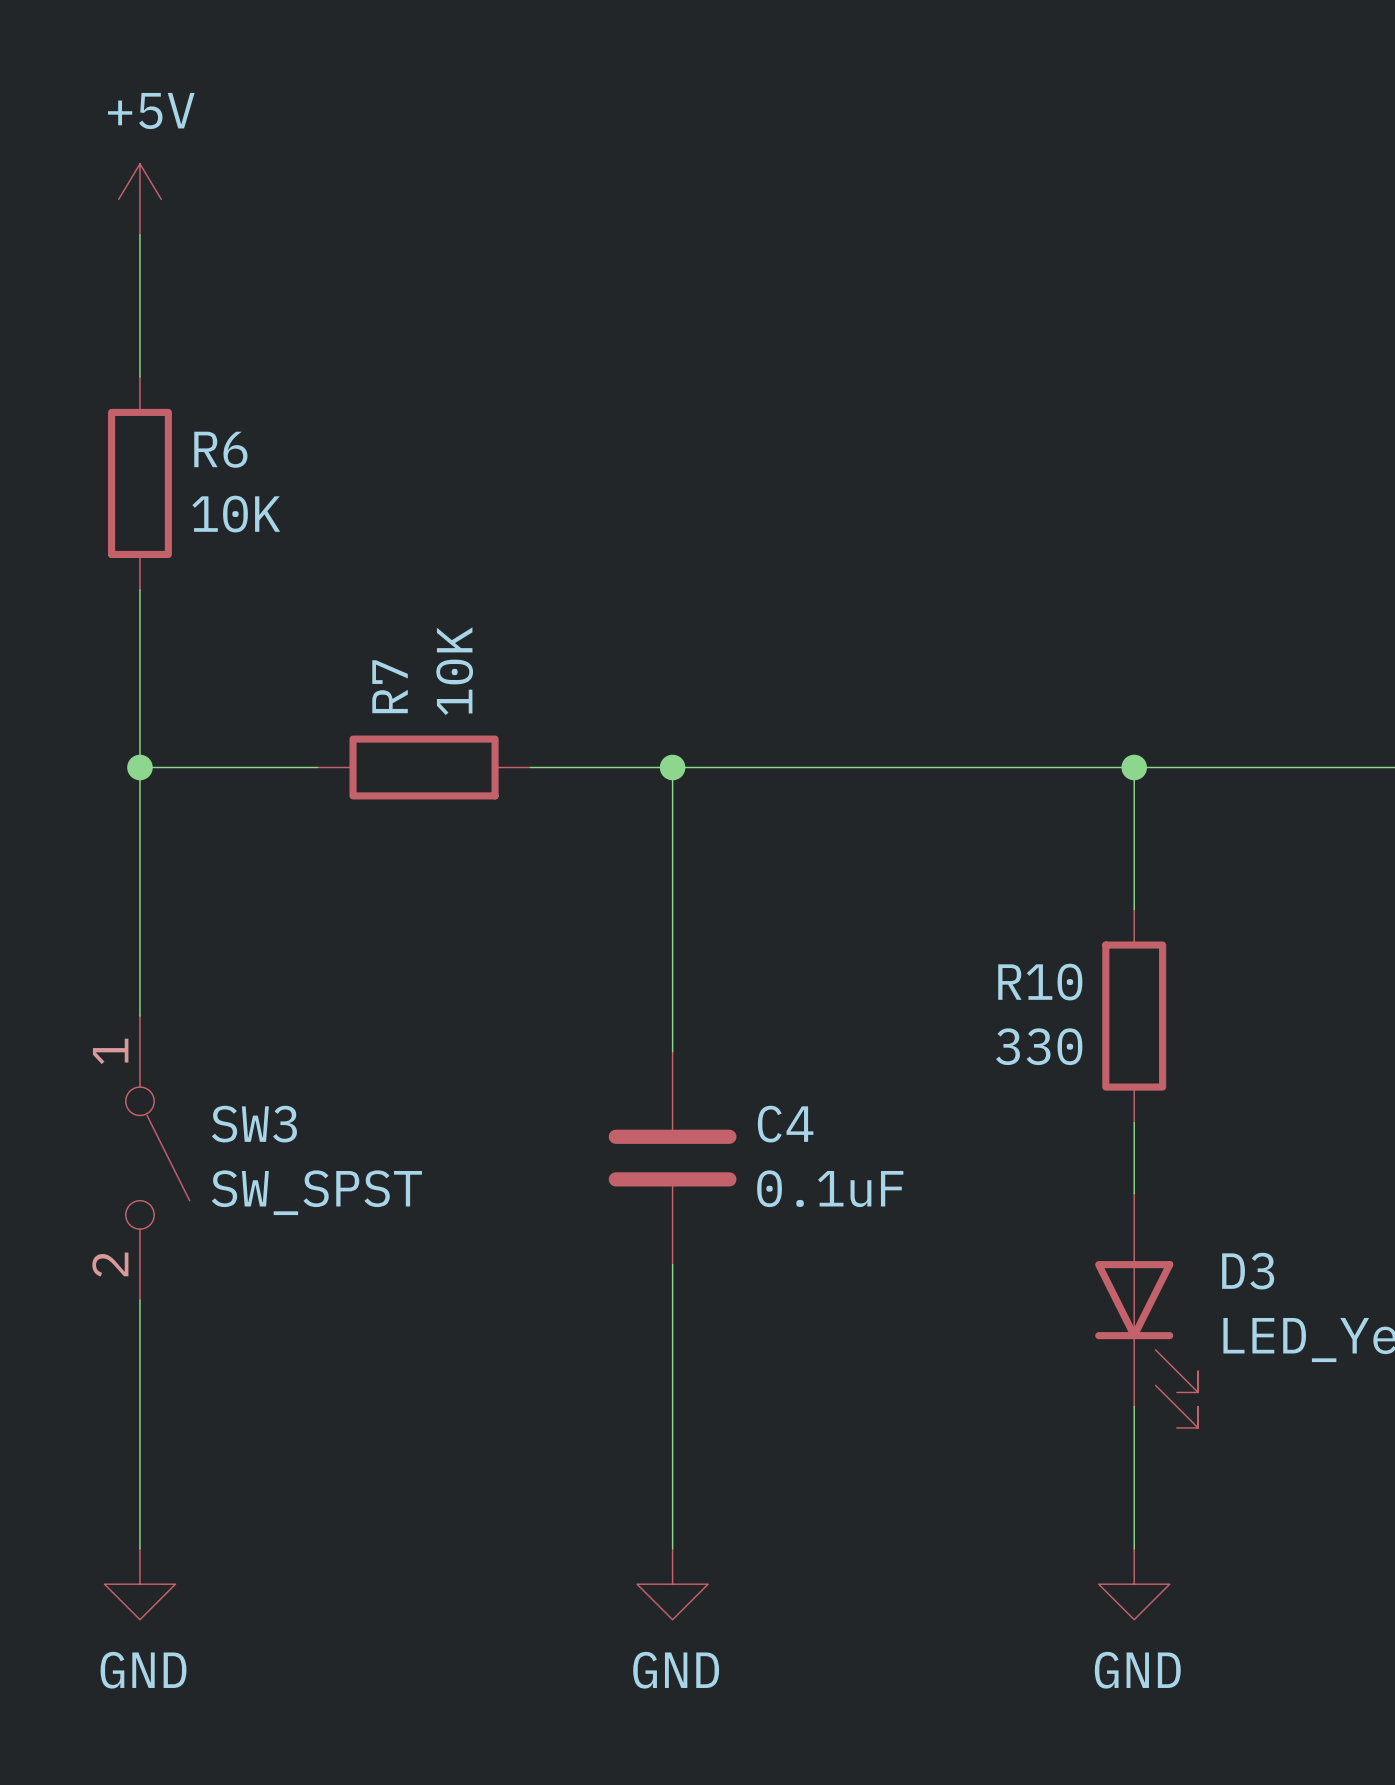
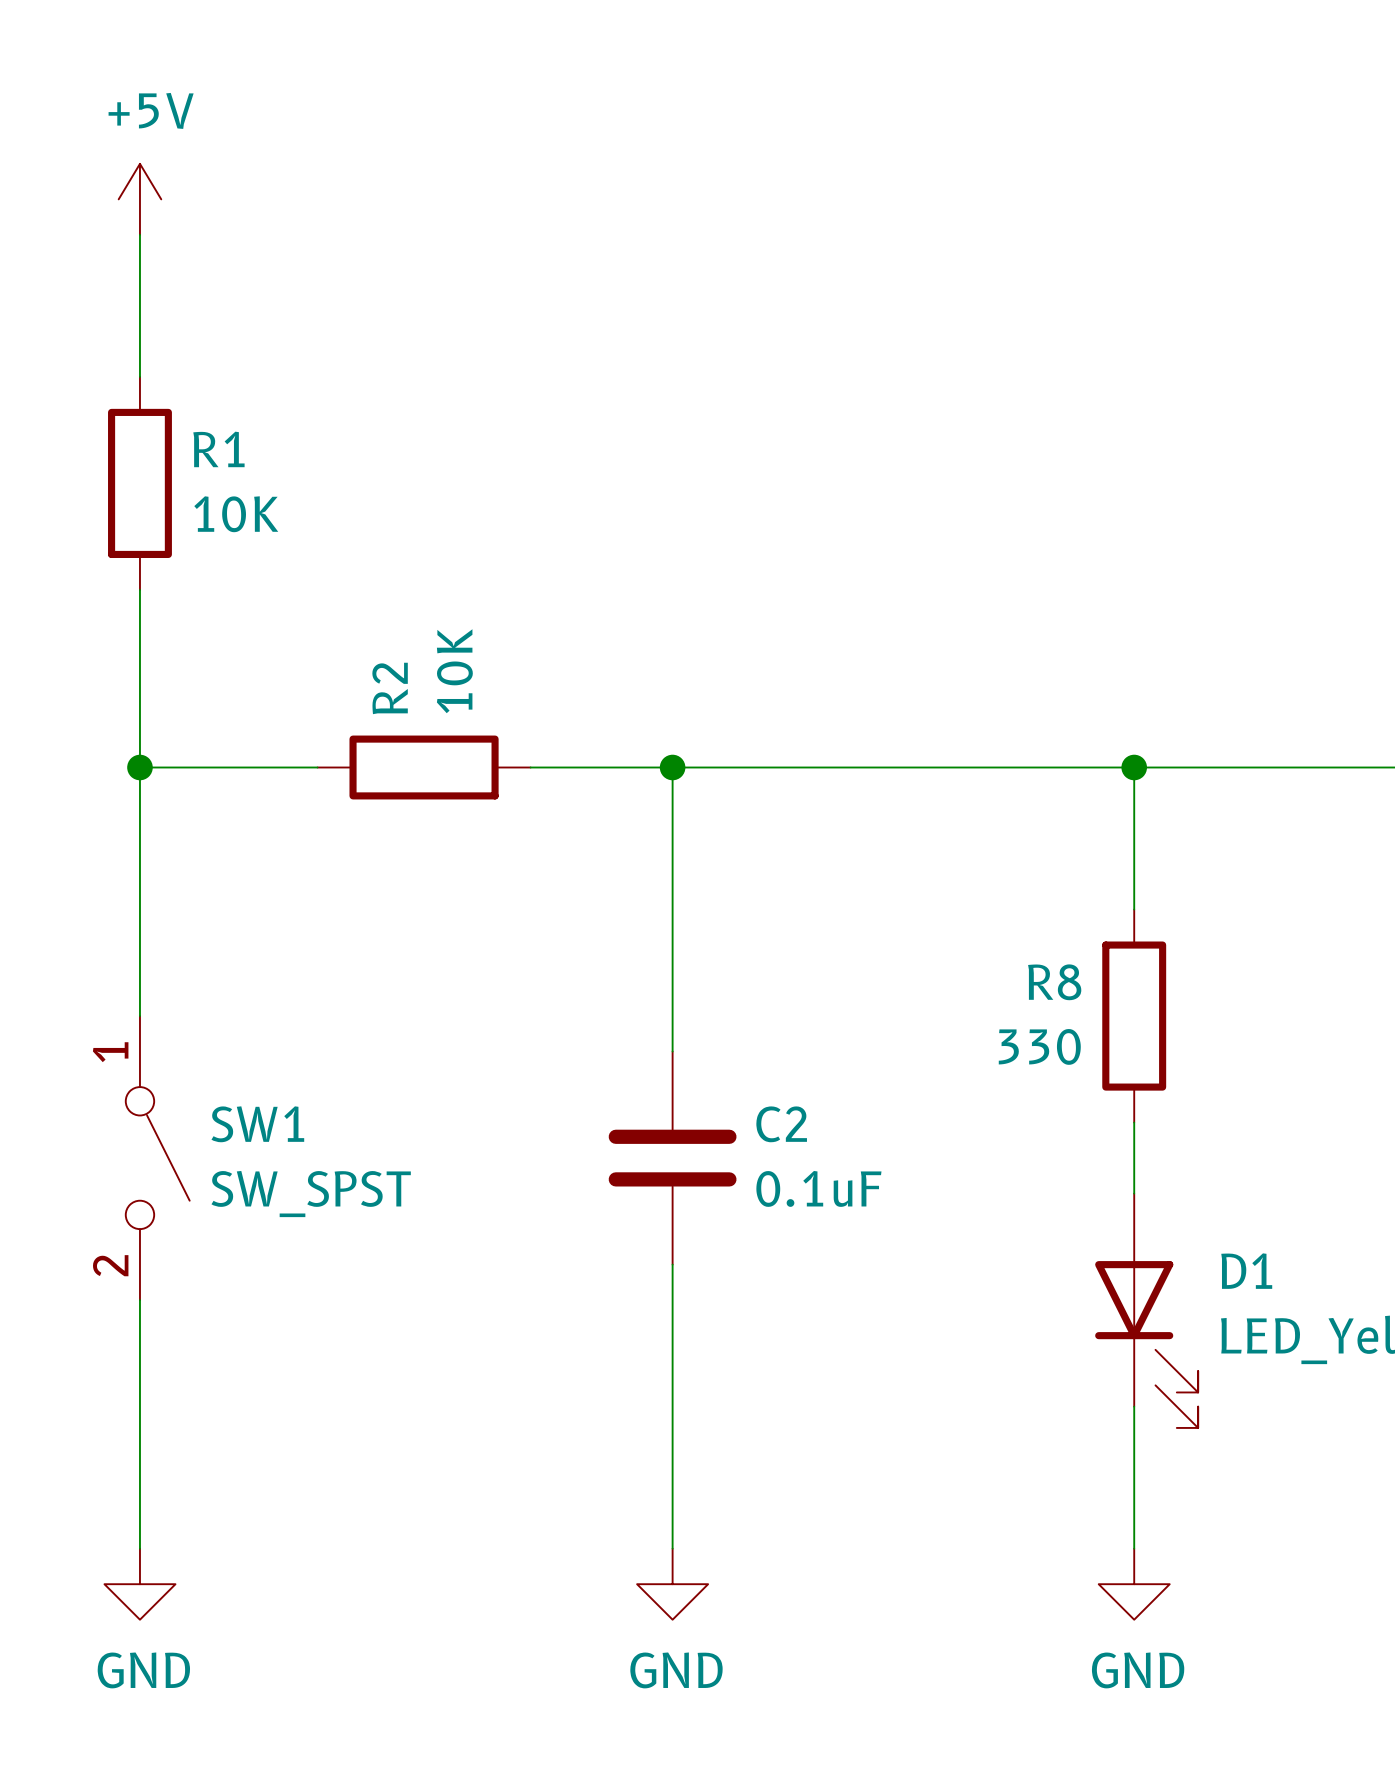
R6 name: R6 (220, 449) -> R1 (218, 449)
R7 name: R7 (390, 686) -> R2 (390, 688)
R10 name: R10 (1040, 982) -> R8 (1054, 982)
SW3 name: SW3 (254, 1124) -> SW1 (257, 1124)
C4 name: C4 (785, 1124) -> C2 (781, 1124)
D3 name: D3 (1248, 1271) -> D1 (1246, 1271)

